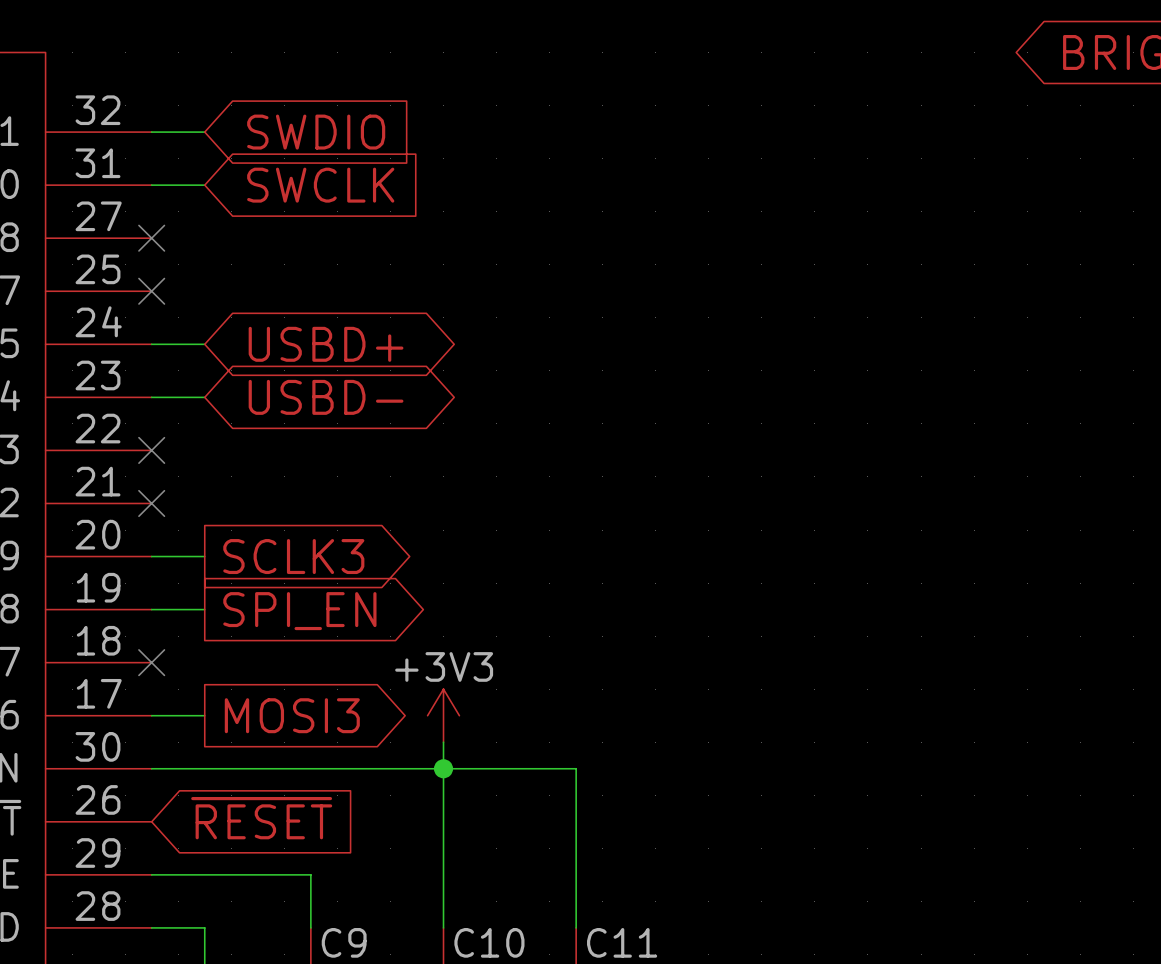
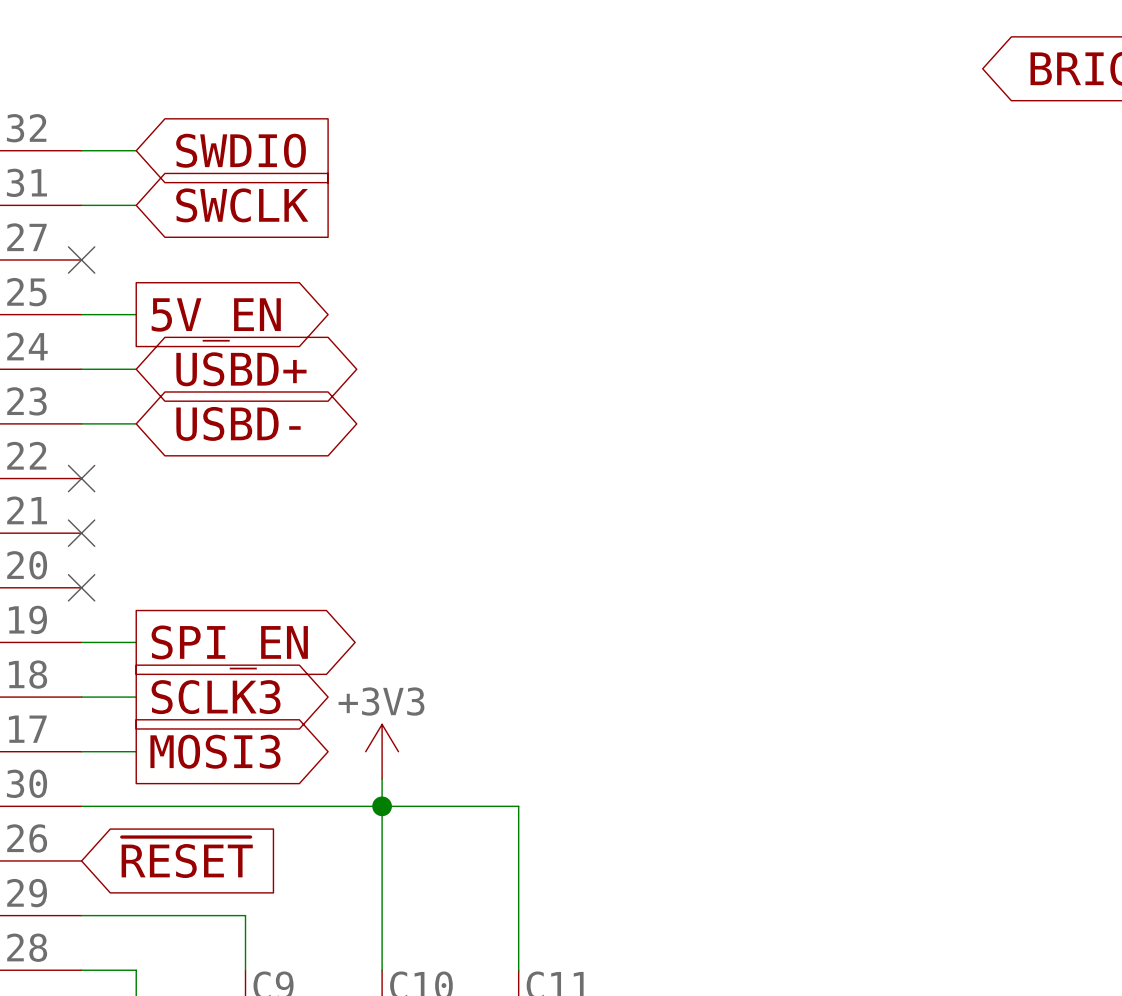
wire: none -> (81, 314) (136, 314)
no-connect mark: (151, 291) -> none
global label: none -> 5V_EN (216, 319)
wire: (151, 556) (204, 556) -> (81, 697) (136, 697)
global label position: SCLK3 (293, 556) -> SCLK3 (216, 697)
no-connect mark position: (151, 662) -> (81, 587)

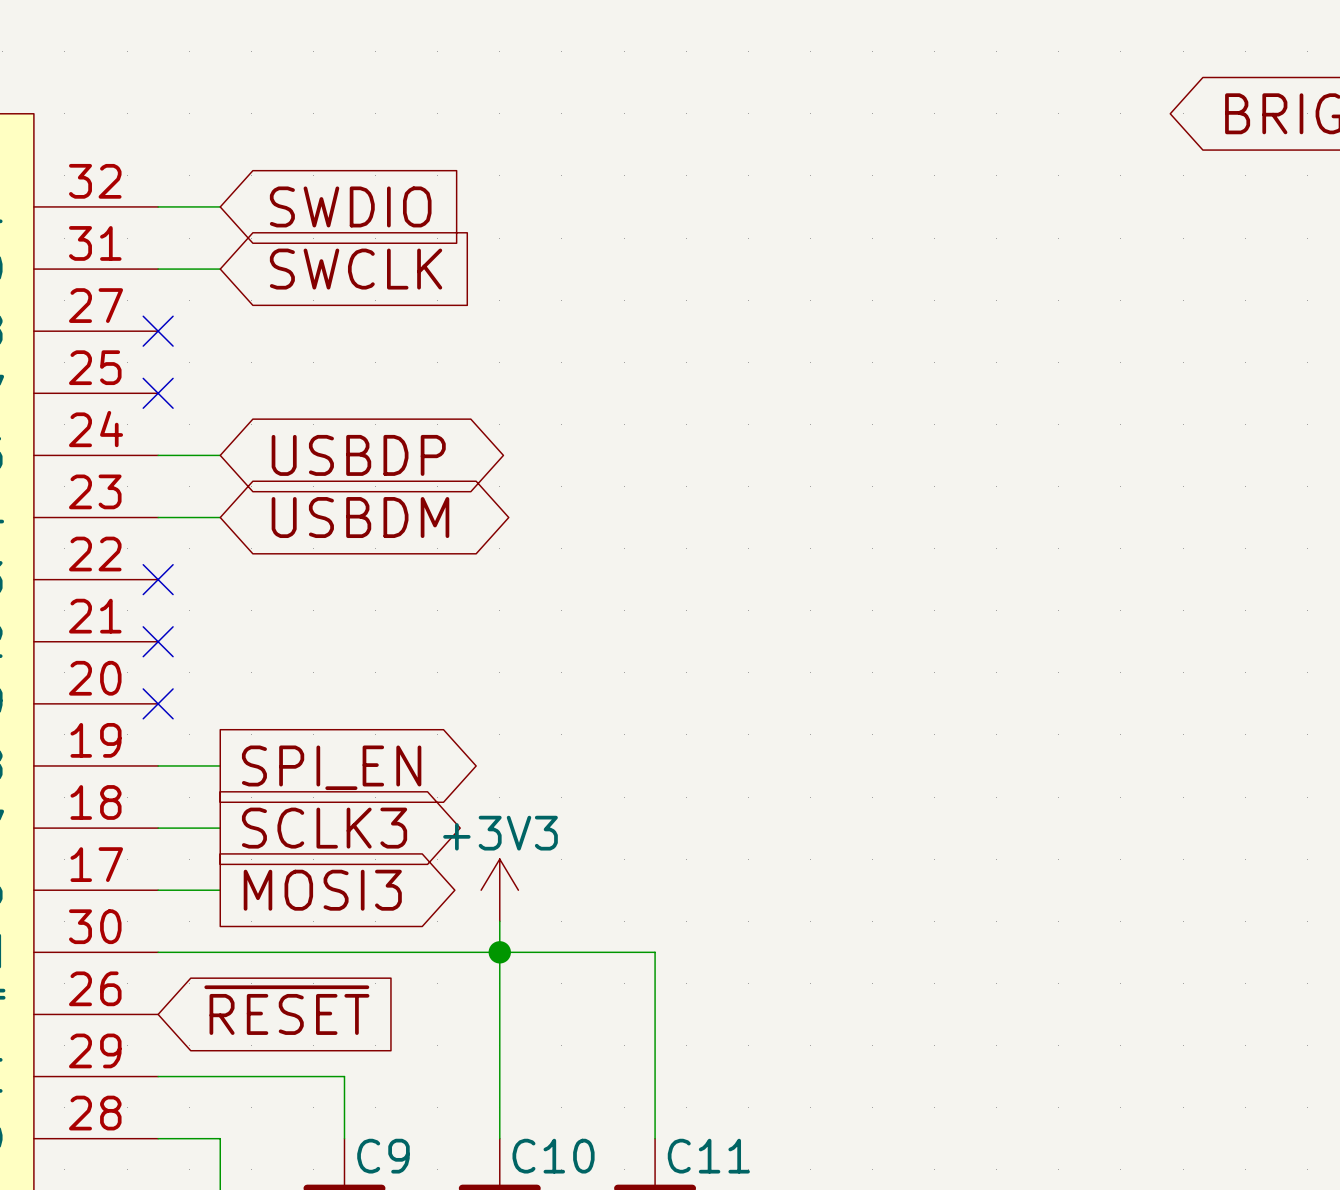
wire: (81, 314) (136, 314) -> none
no-connect mark: none -> (158, 393)
global label: 5V_EN (216, 319) -> none
global label: USBD+ (241, 369) -> USBDP (358, 455)
global label: USBD- (238, 423) -> USBDM (360, 517)

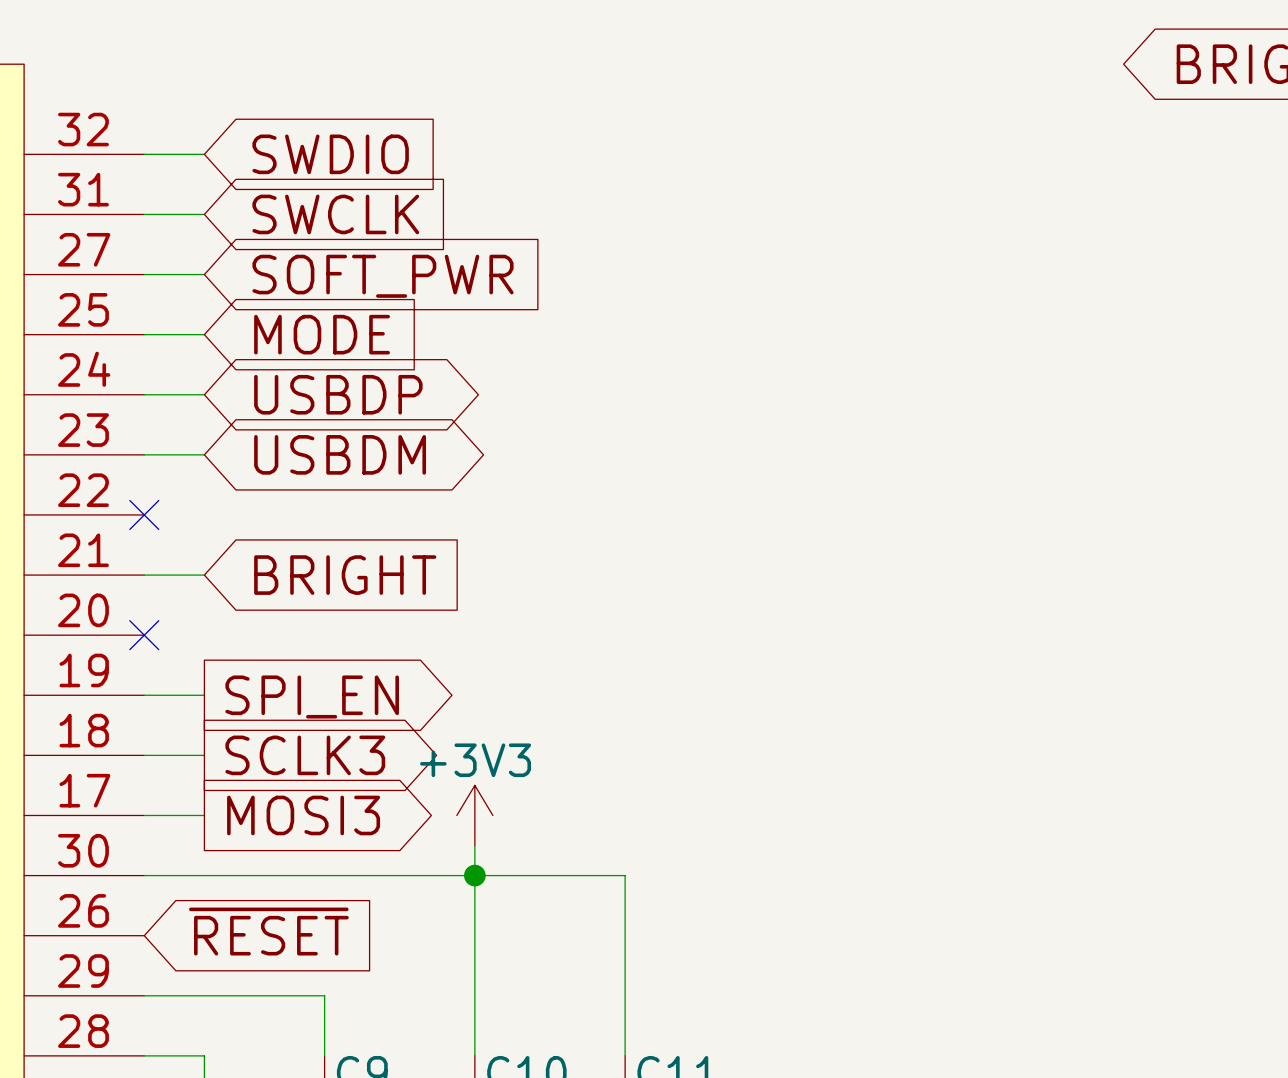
wire: none -> (144, 274) (204, 274)
no-connect mark: (158, 331) -> none
global label: none -> SOFT_PWR (383, 276)
wire: none -> (144, 334) (204, 334)
no-connect mark: (158, 393) -> none
global label: none -> MODE (322, 334)
wire: none -> (144, 575) (204, 575)
no-connect mark: (158, 641) -> none
global label: none -> BRIGHT (345, 575)

